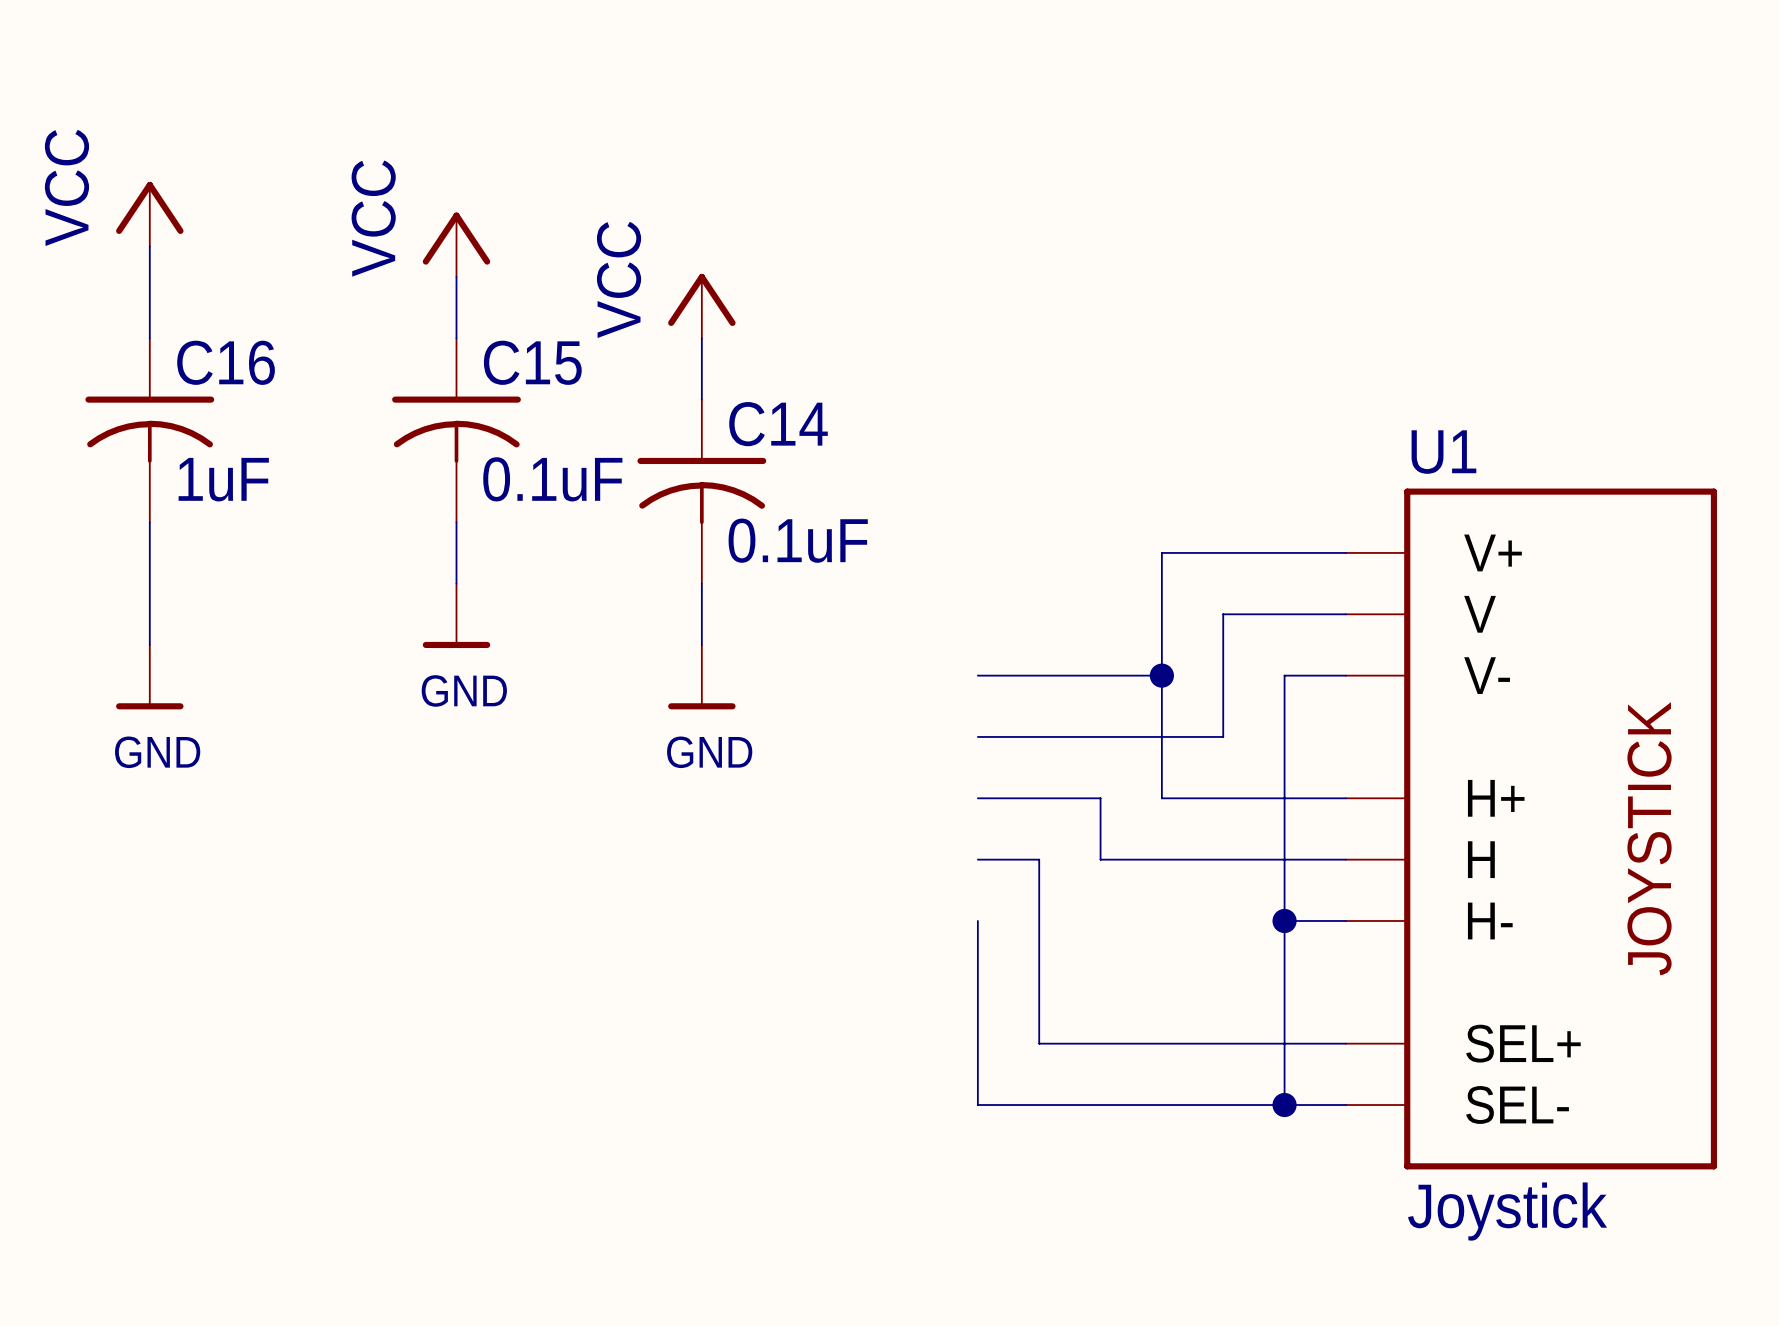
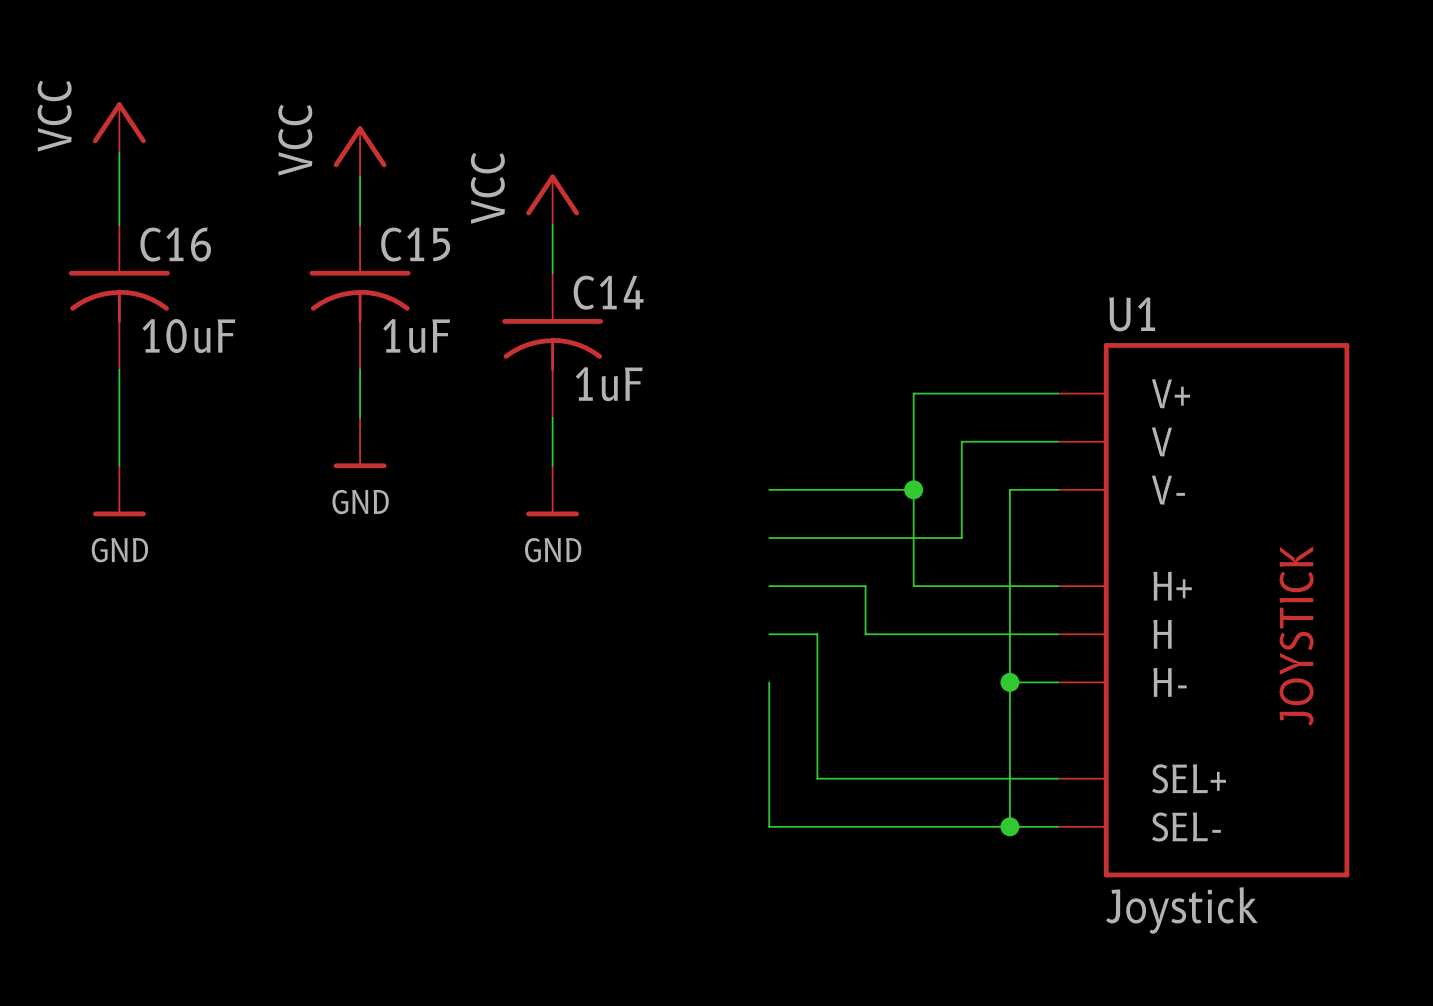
C16 value: 1uF (223, 479) -> 10uF (188, 335)
C15 value: 0.1uF (552, 479) -> 1uF (416, 335)
C14 value: 0.1uF (798, 540) -> 1uF (609, 384)

